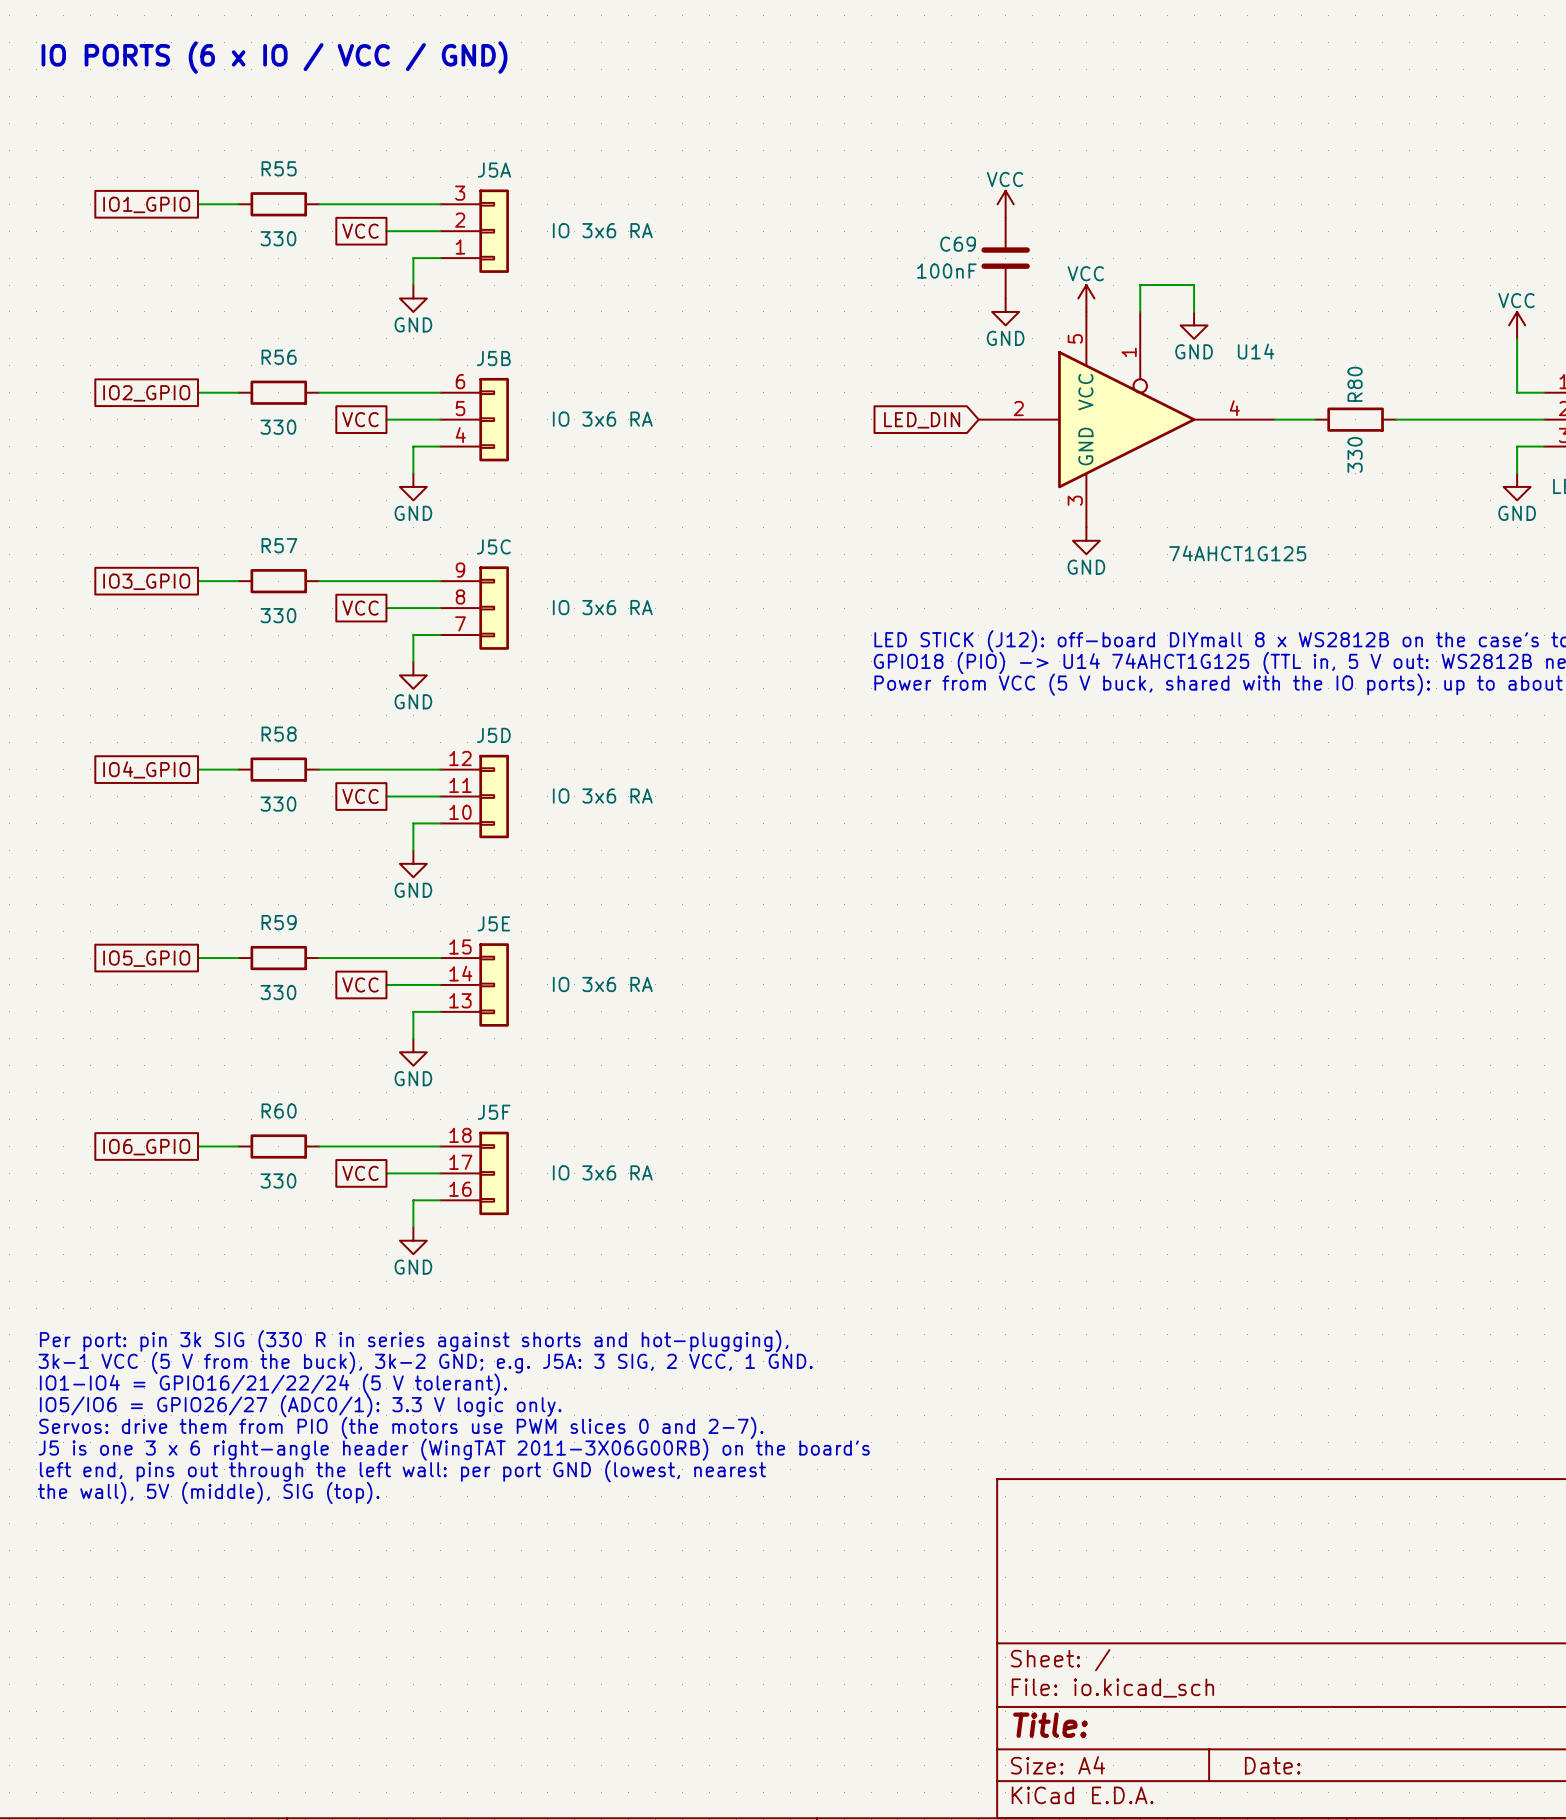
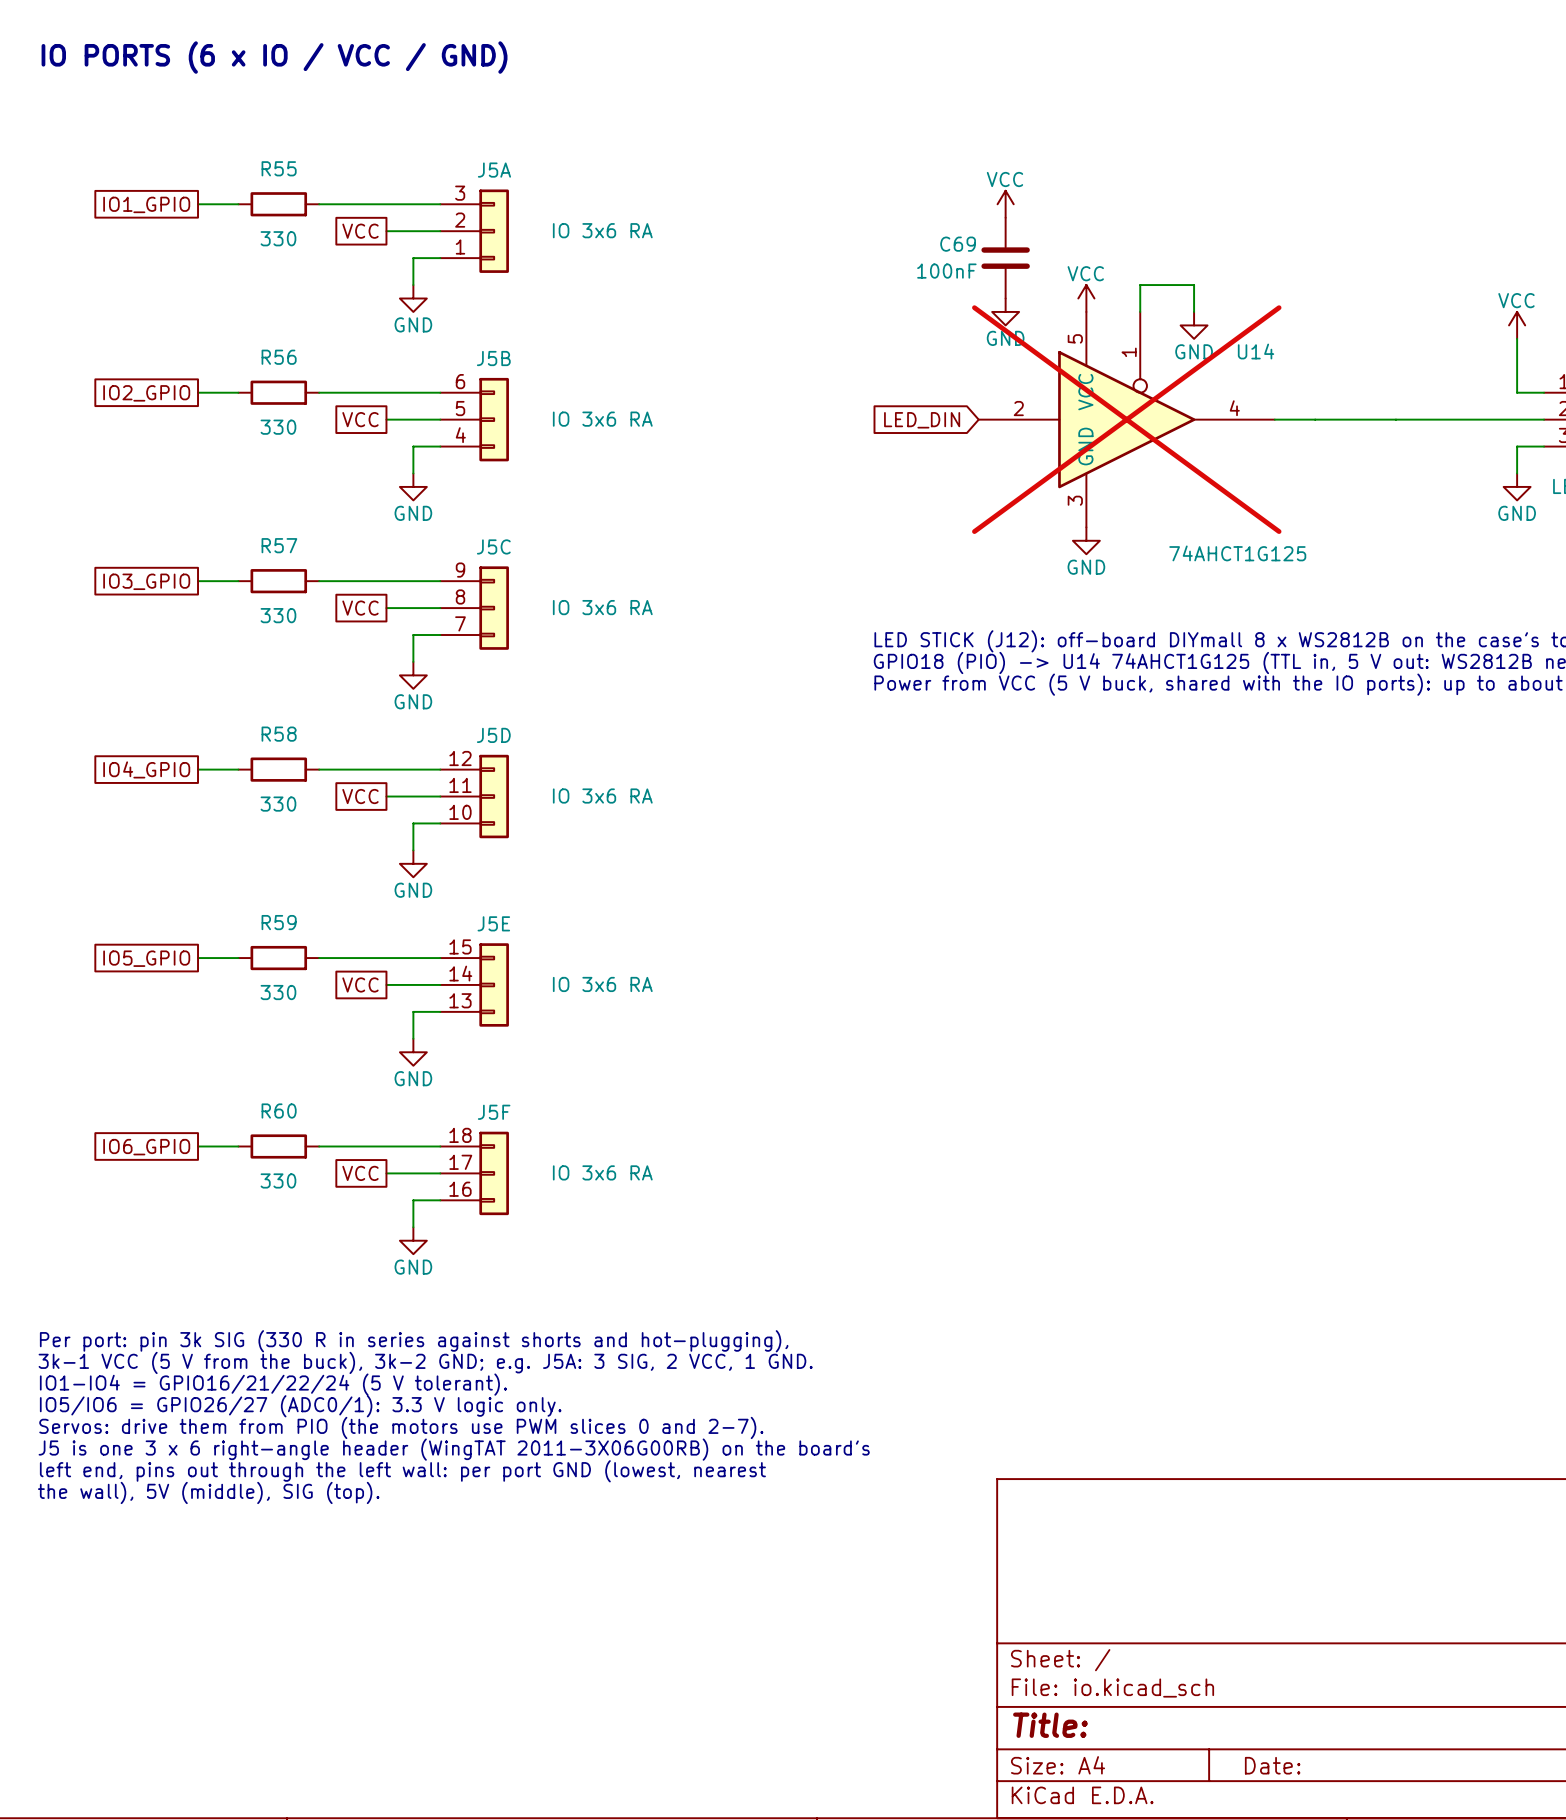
U14 do-not-place cross: none -> (1126, 419)
wire: none -> (1315, 419) (1395, 419)
R80: 330 (1355, 419) -> none

